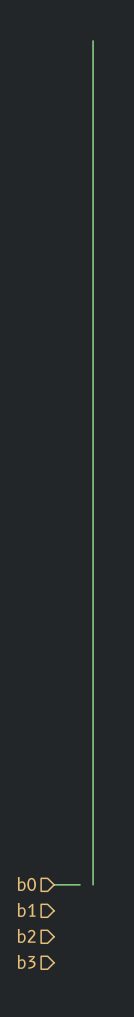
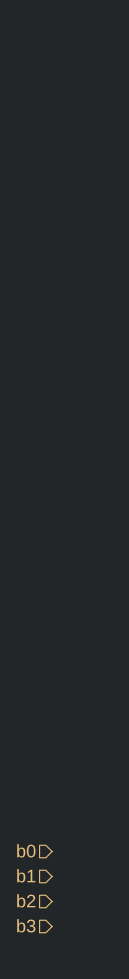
wire: (93, 40) (93, 884) -> none
wire: (54, 884) (80, 884) -> none

